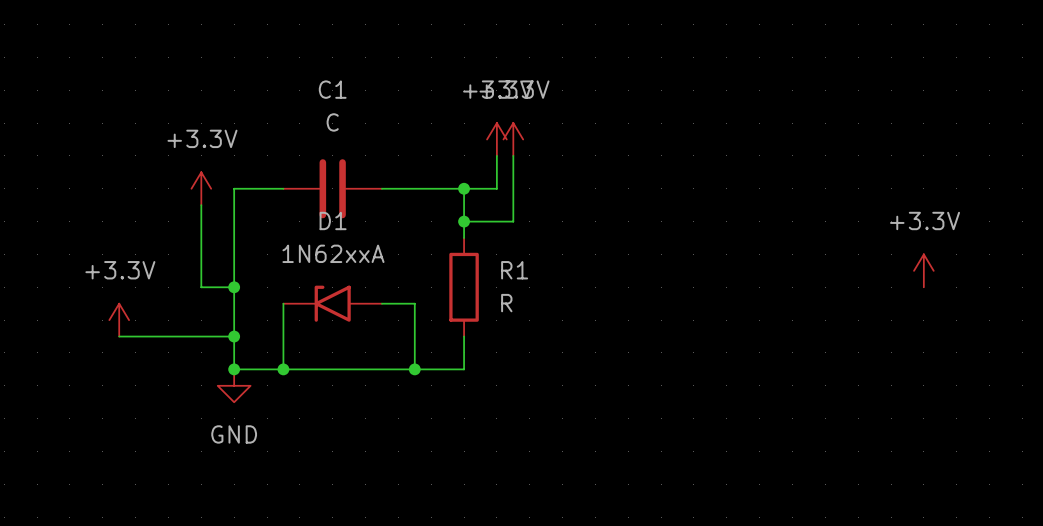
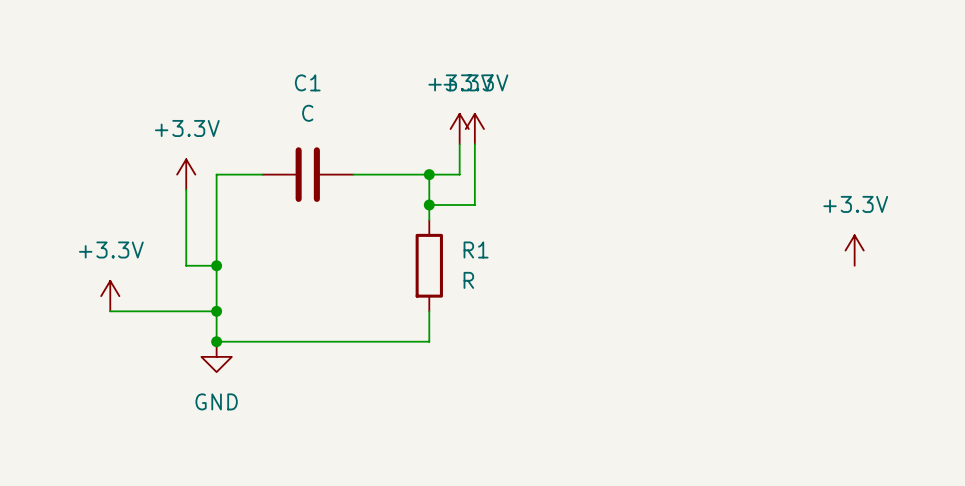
wire: (283, 303) (283, 369) -> none
D1: 1N62xxA (332, 303) -> none
wire: (381, 303) (414, 303) (414, 369) -> none
junction: (283, 369) -> none
junction: (414, 369) -> none

